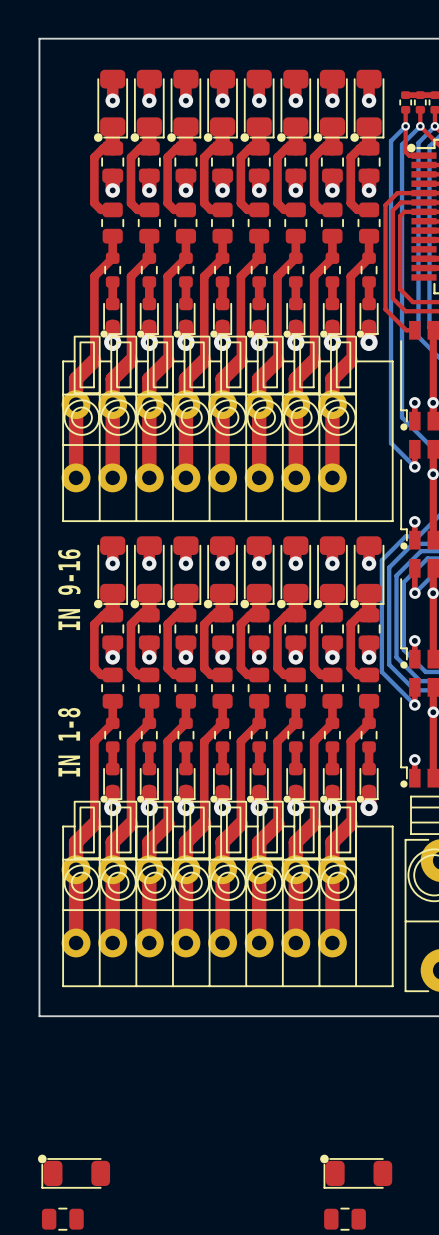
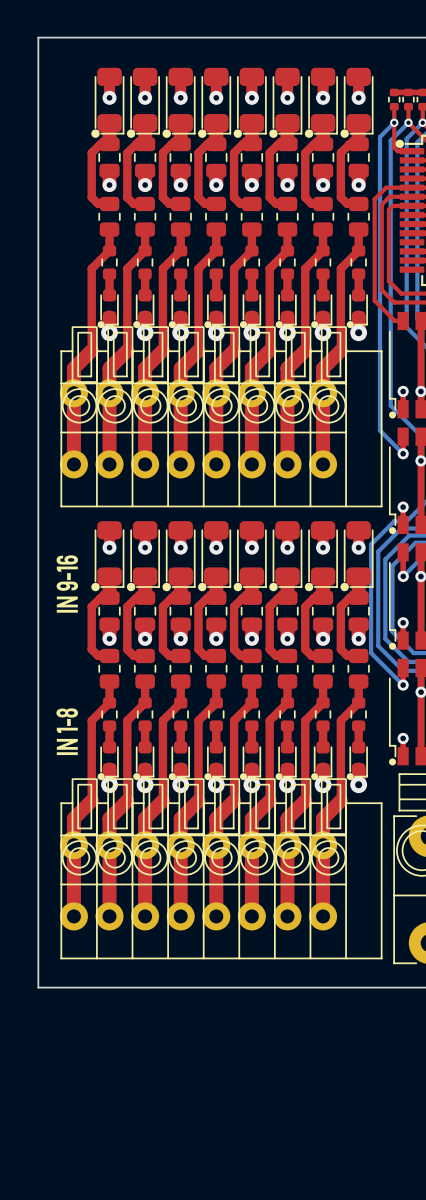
part: (74, 1171) -> none
part: (356, 1171) -> none
part: (62, 1219) -> none
part: (345, 1219) -> none

